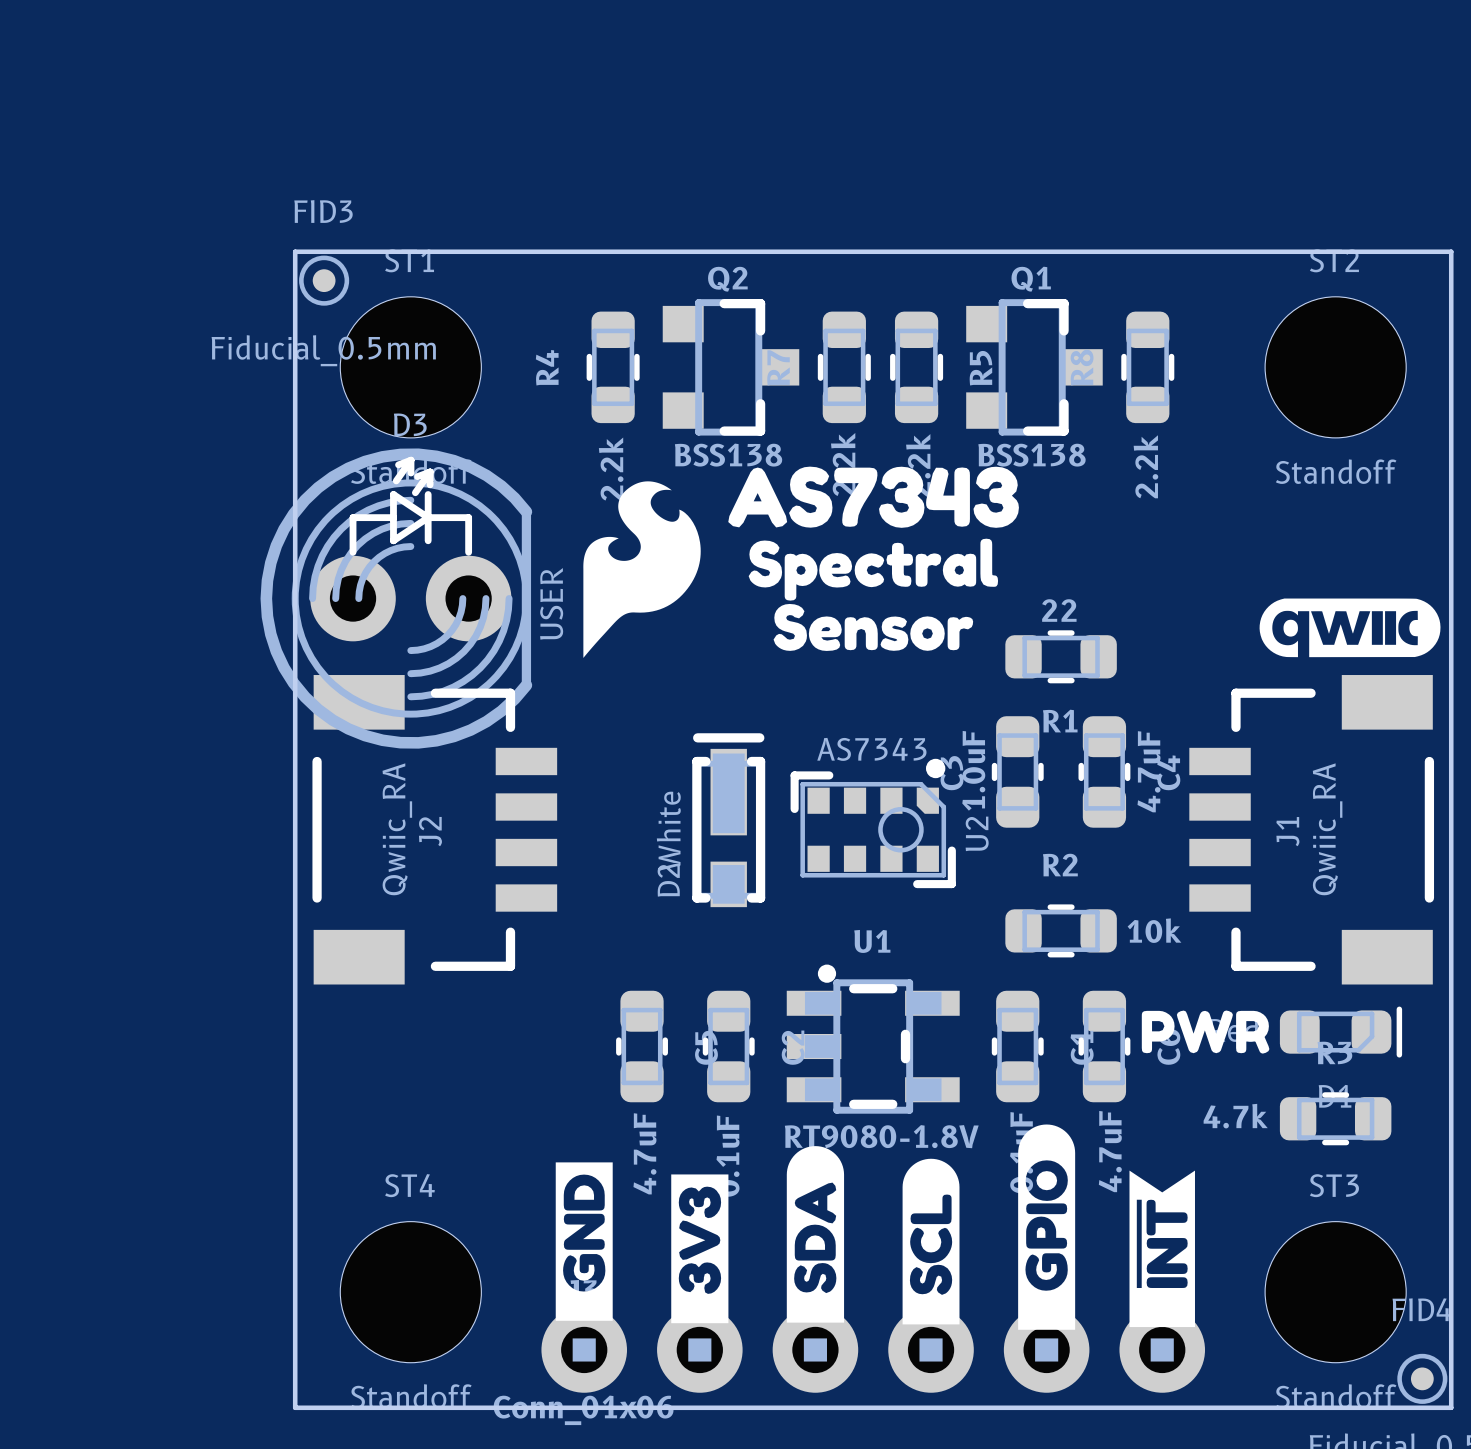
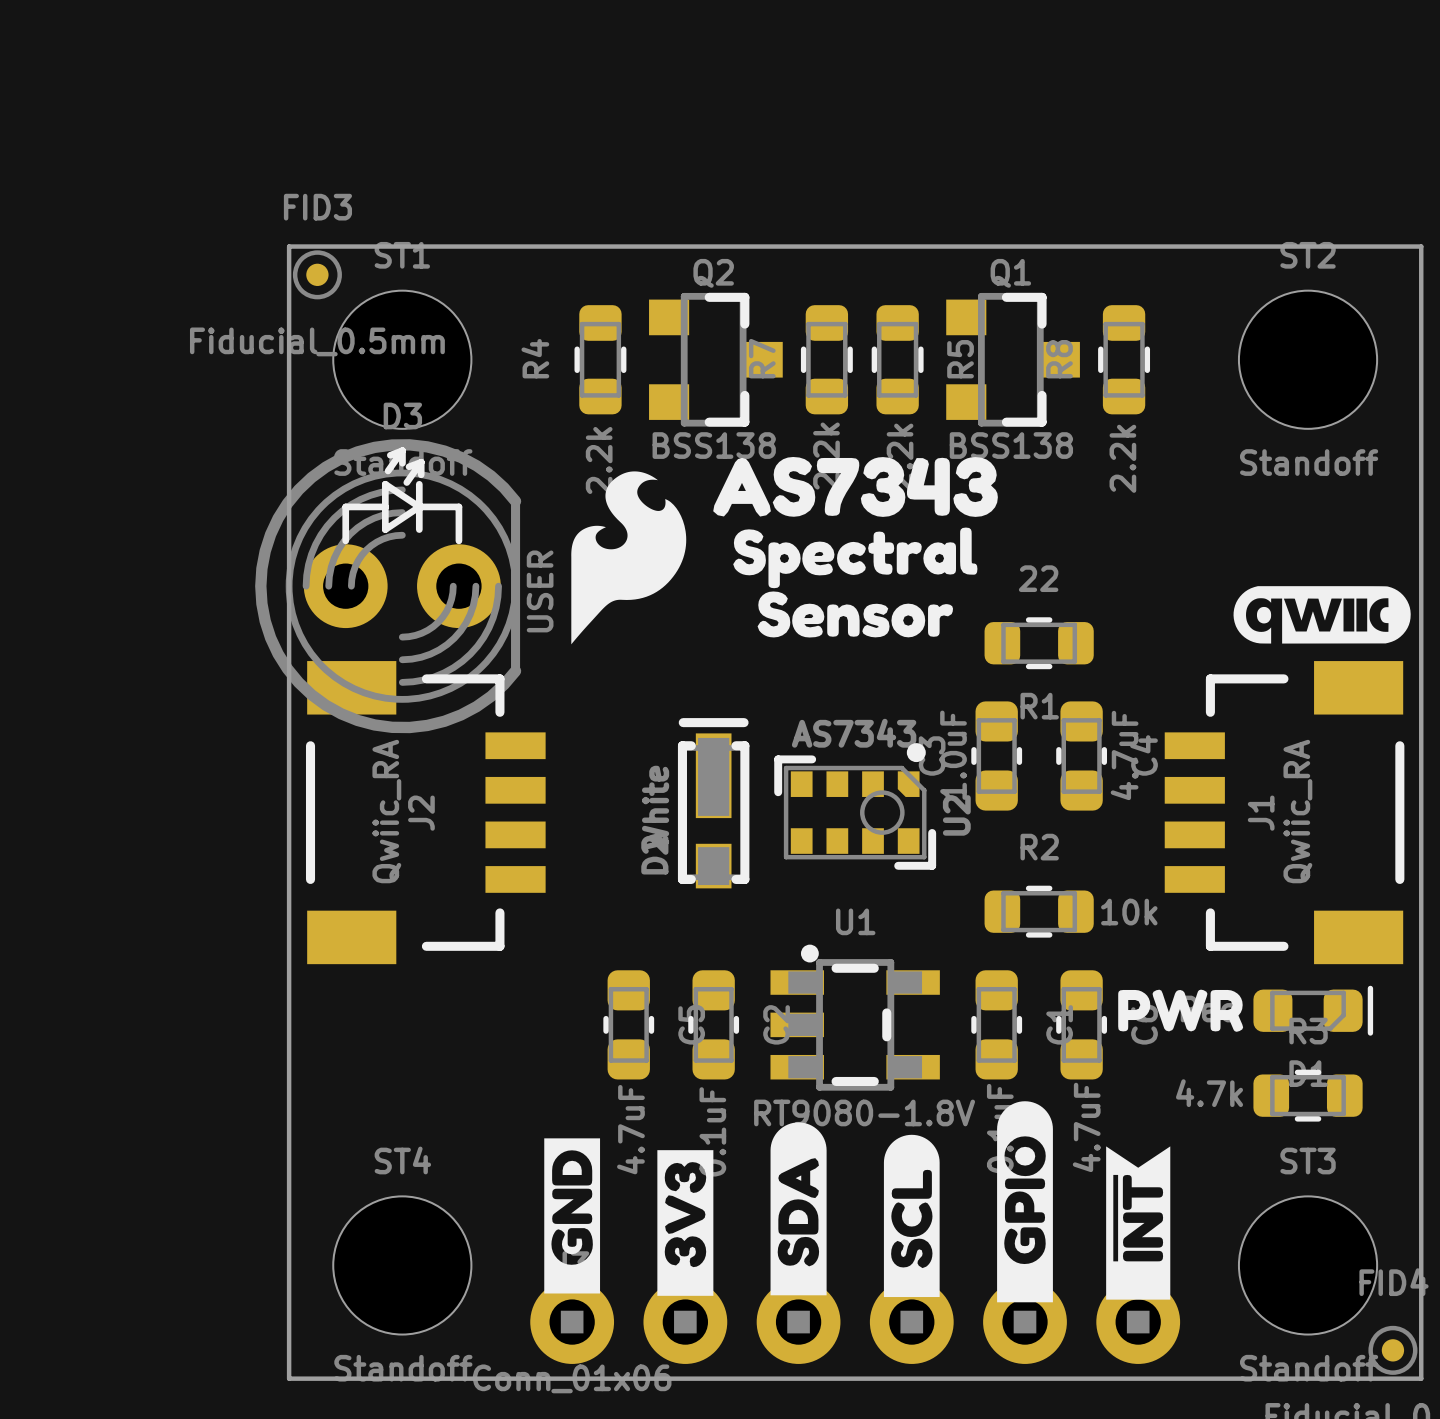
R1 value position: 22 (1059, 610) -> 22 (1038, 578)

